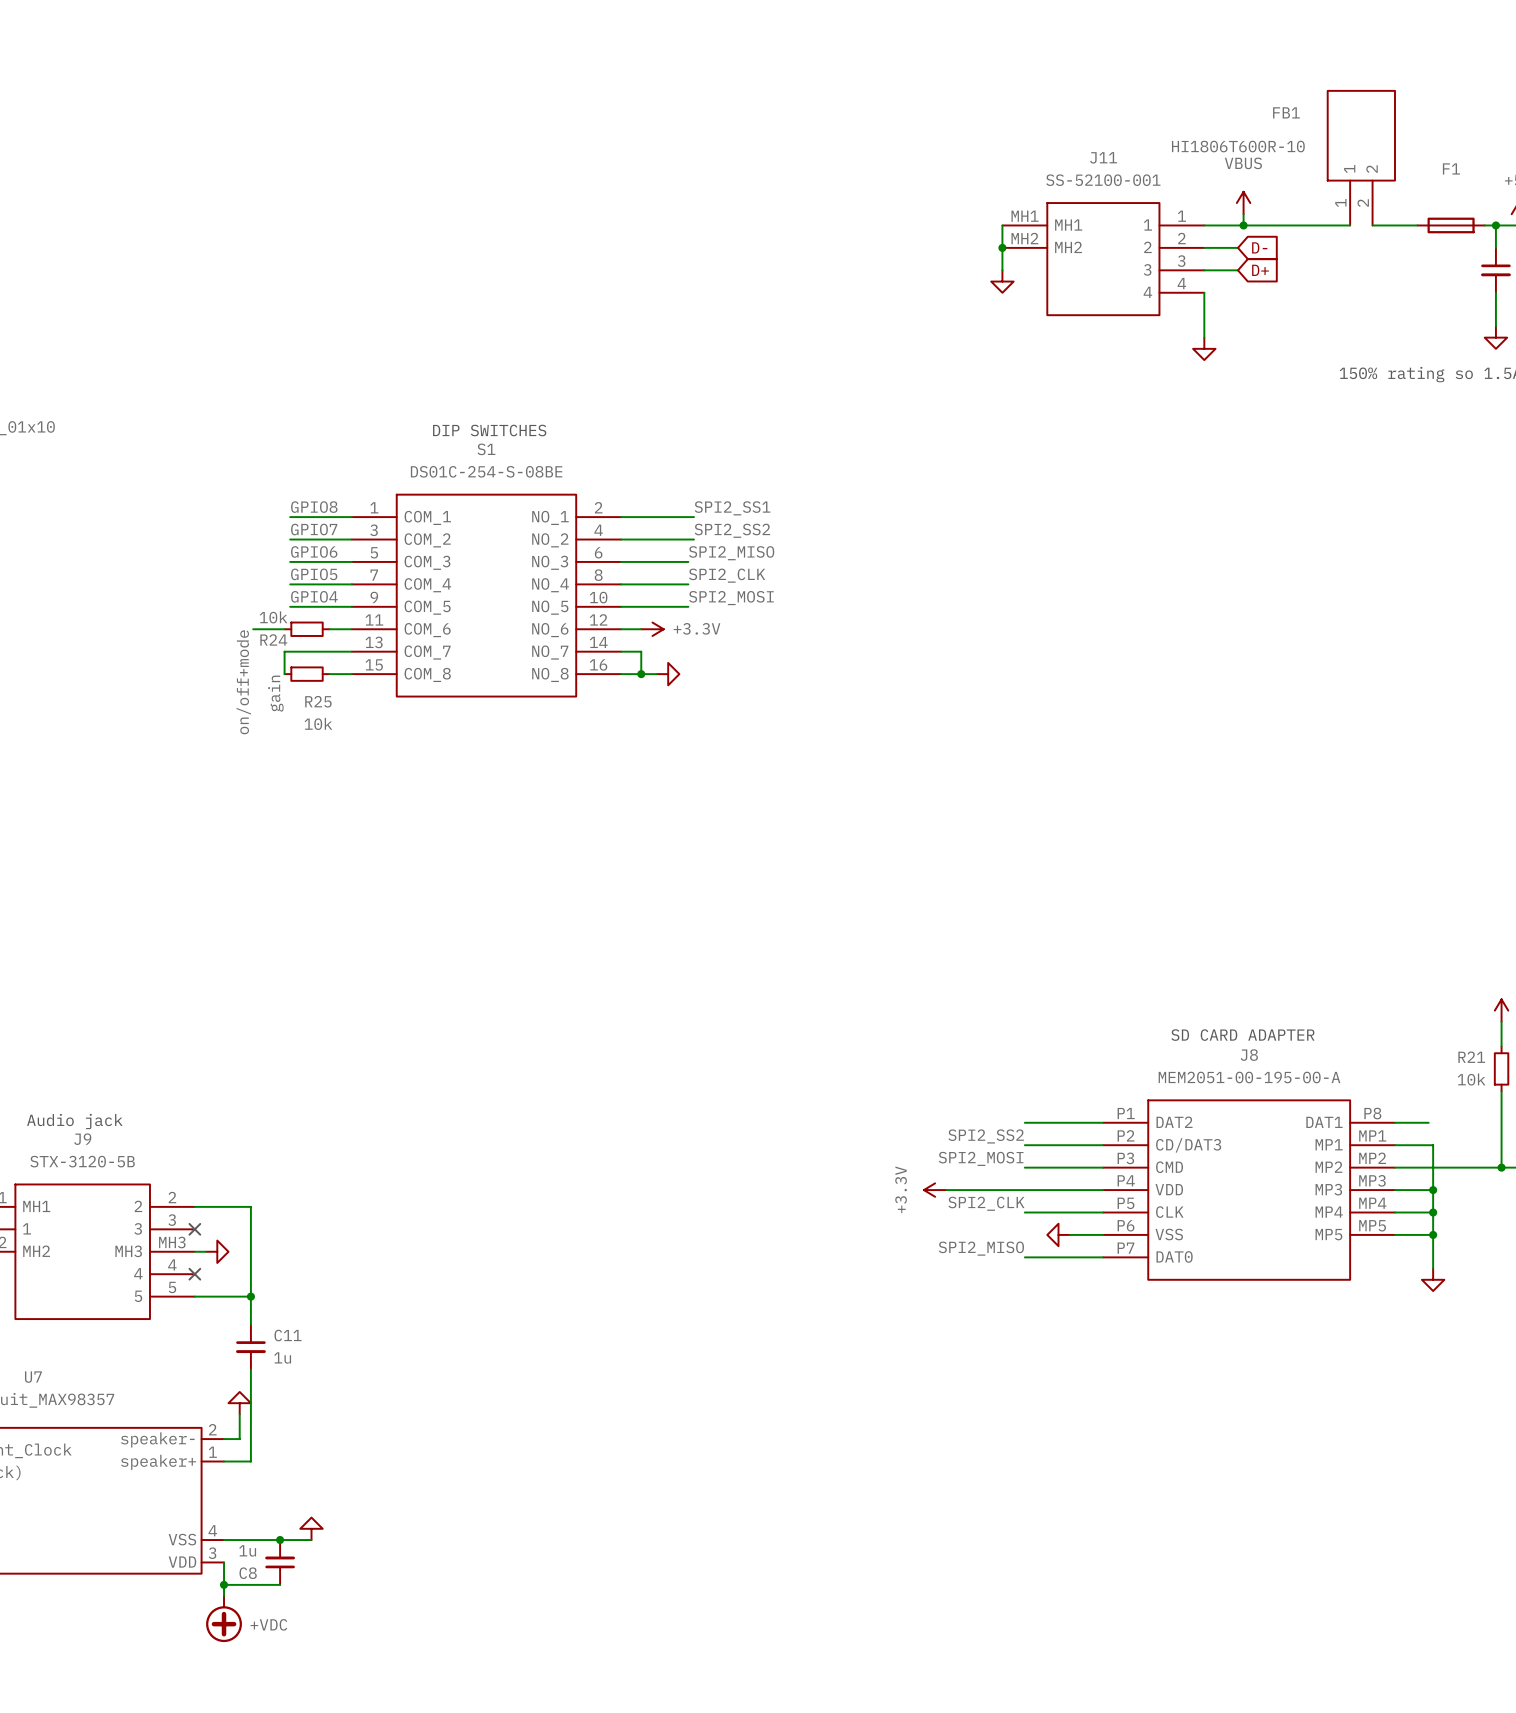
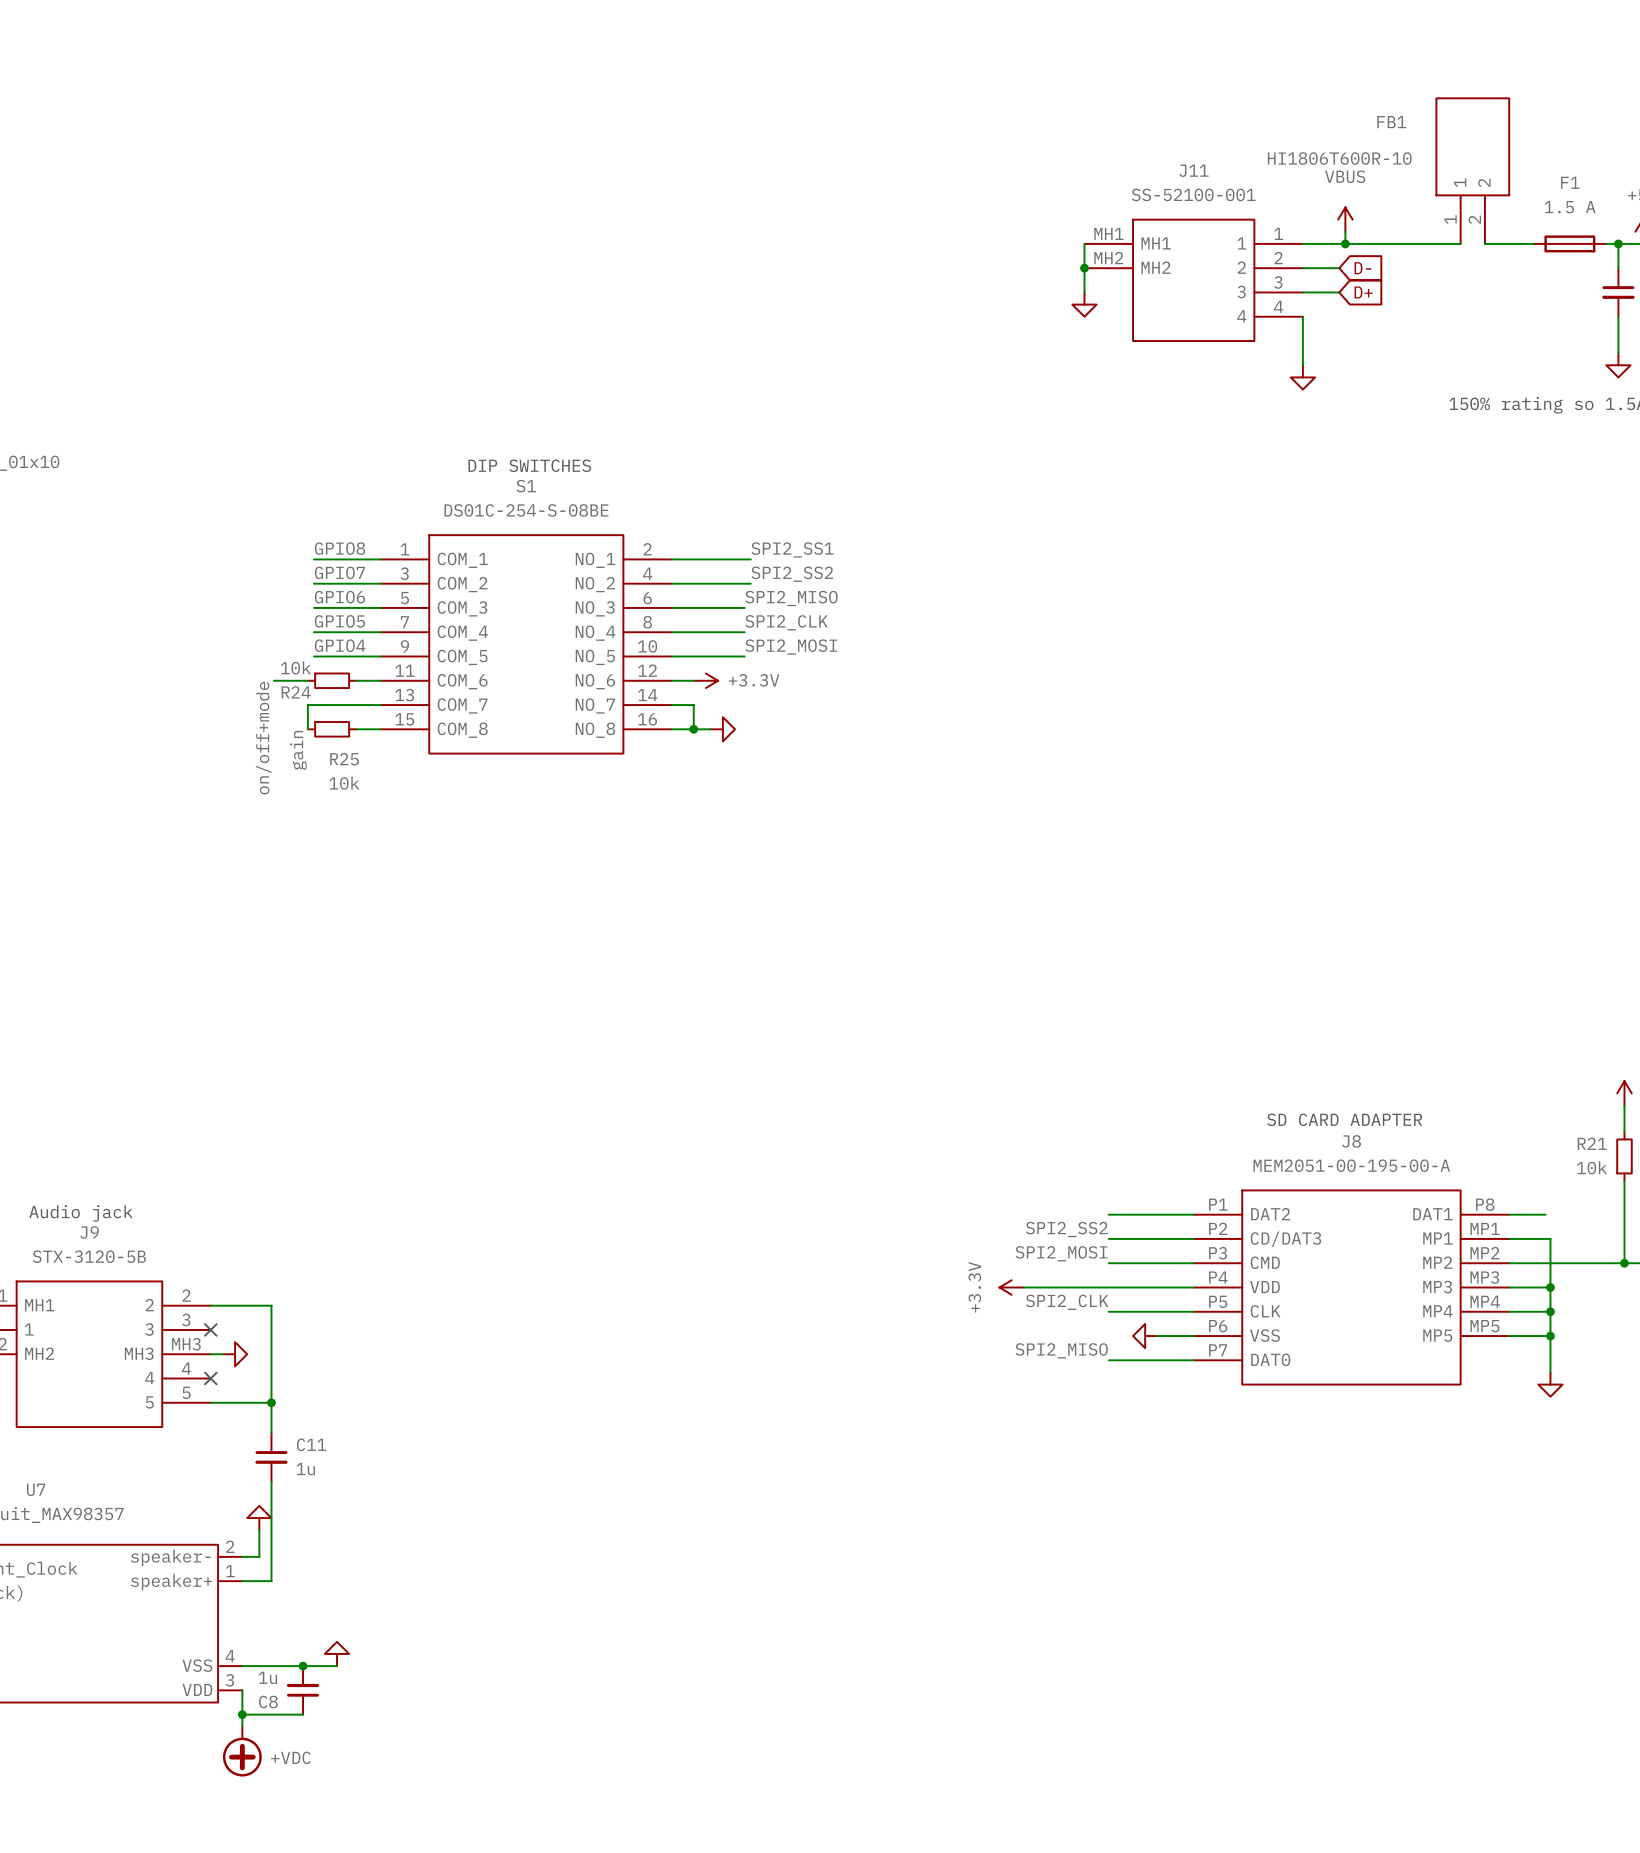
F1 value: none -> 1.5 A (1570, 207)

